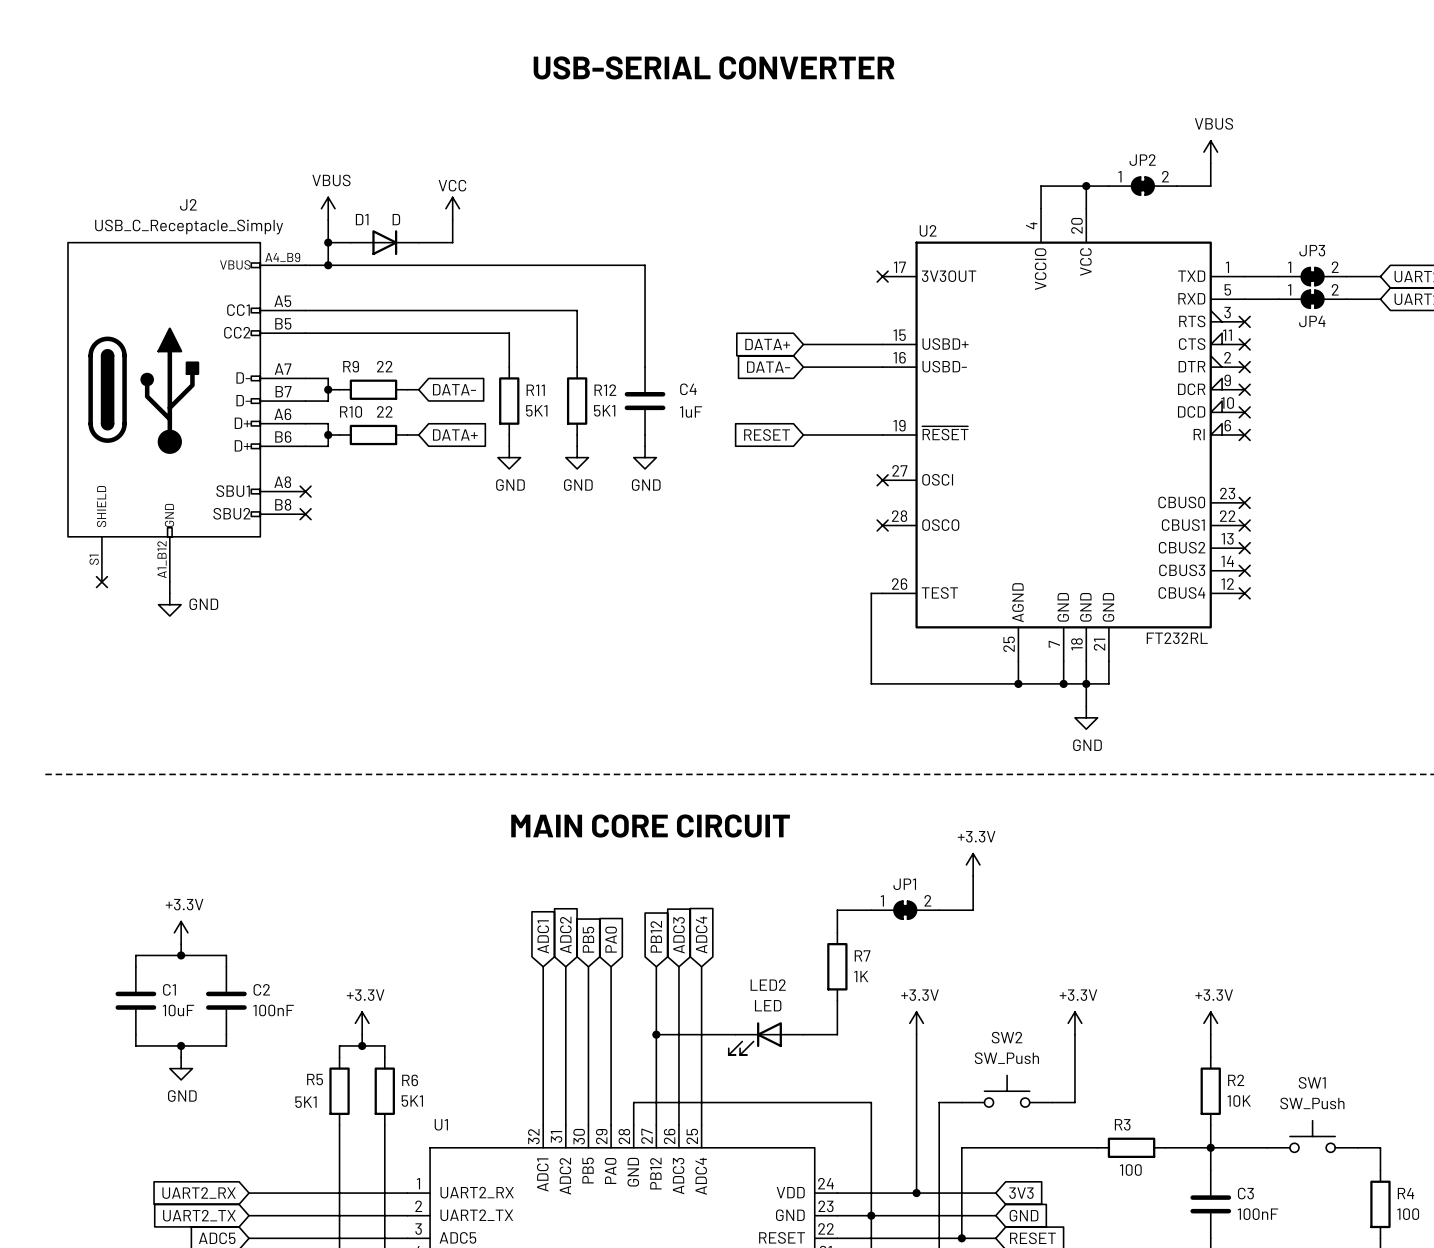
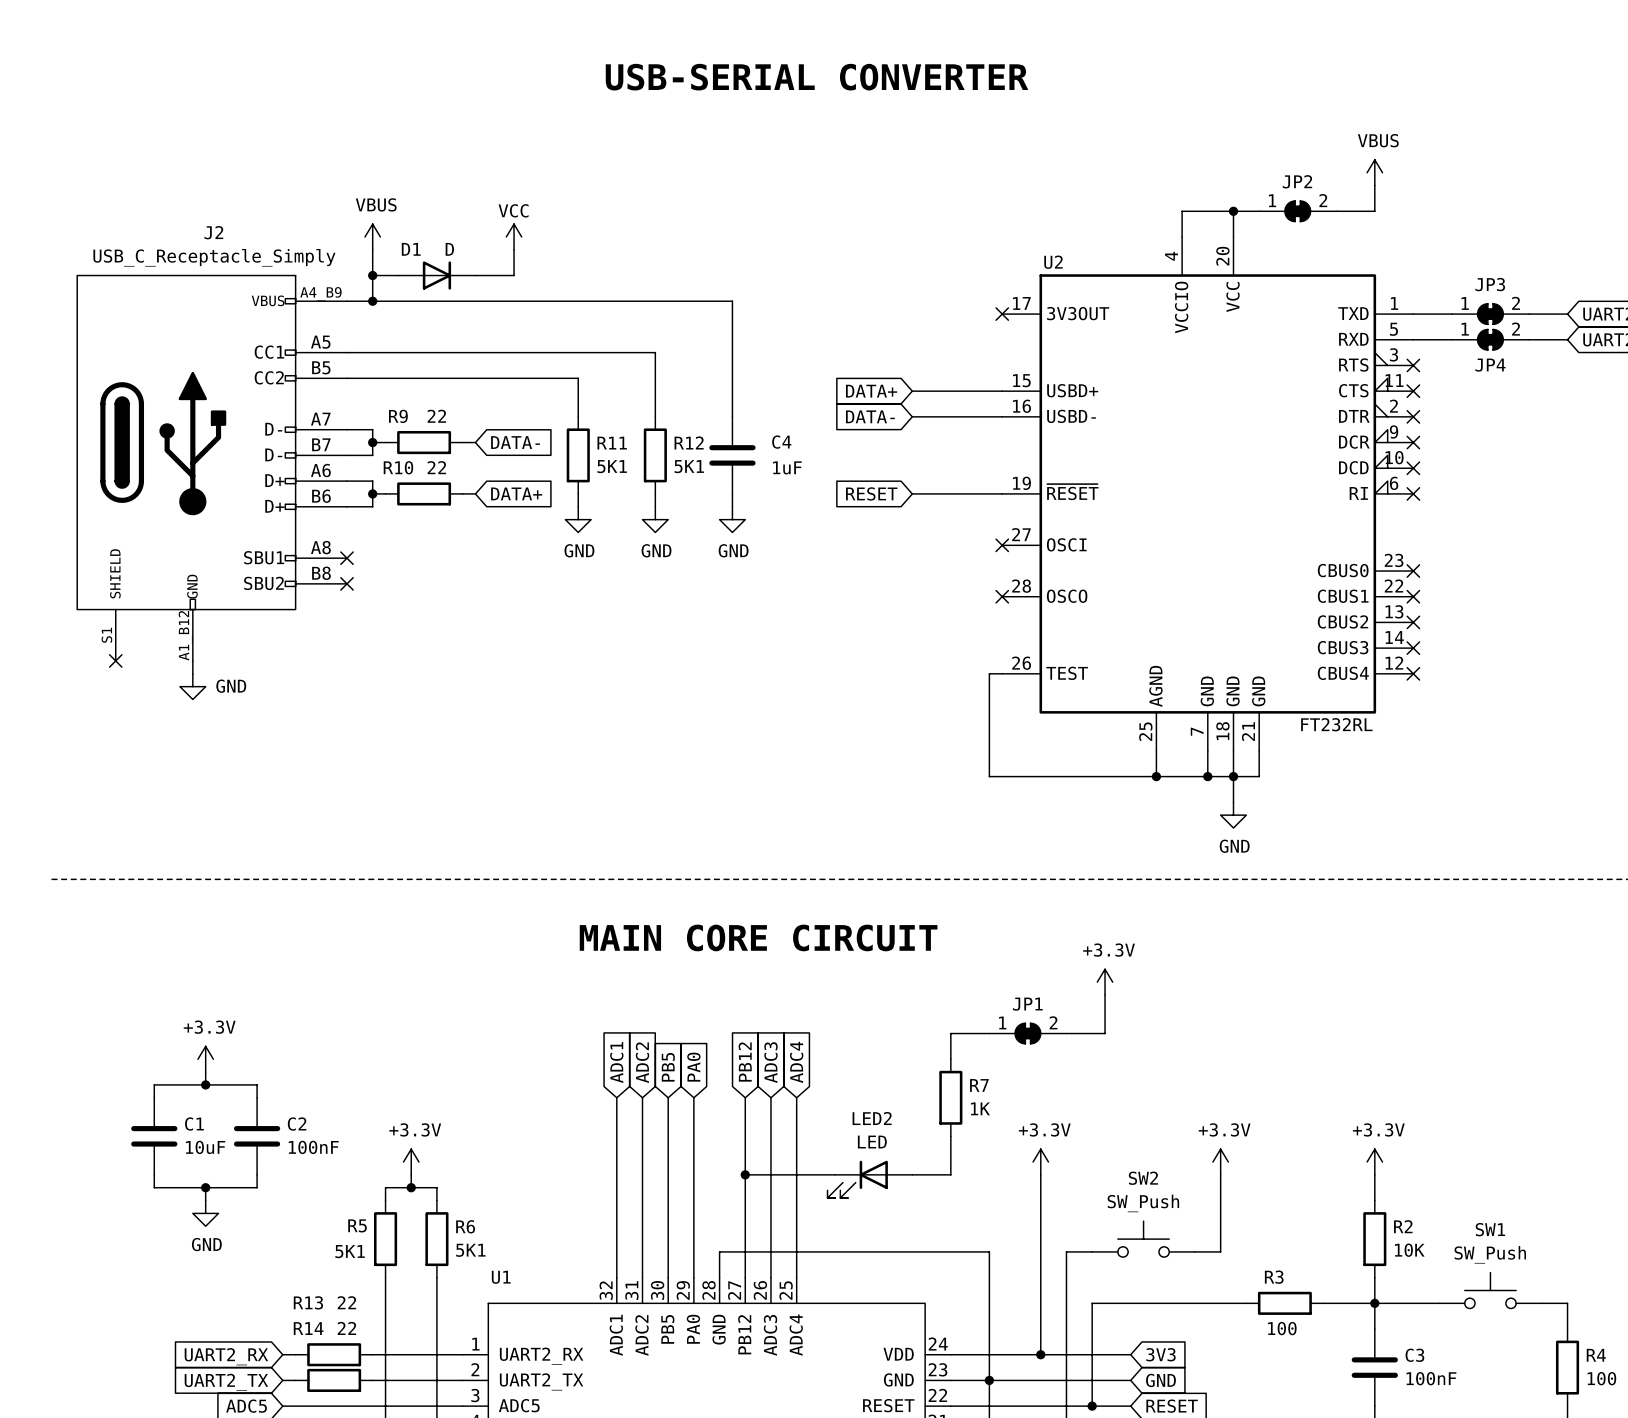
wire: (260, 1193) (328, 1193) -> none
R13: none -> 22 (334, 1354)
wire: (260, 1215) (328, 1215) -> none
R14: none -> 22 (334, 1380)

